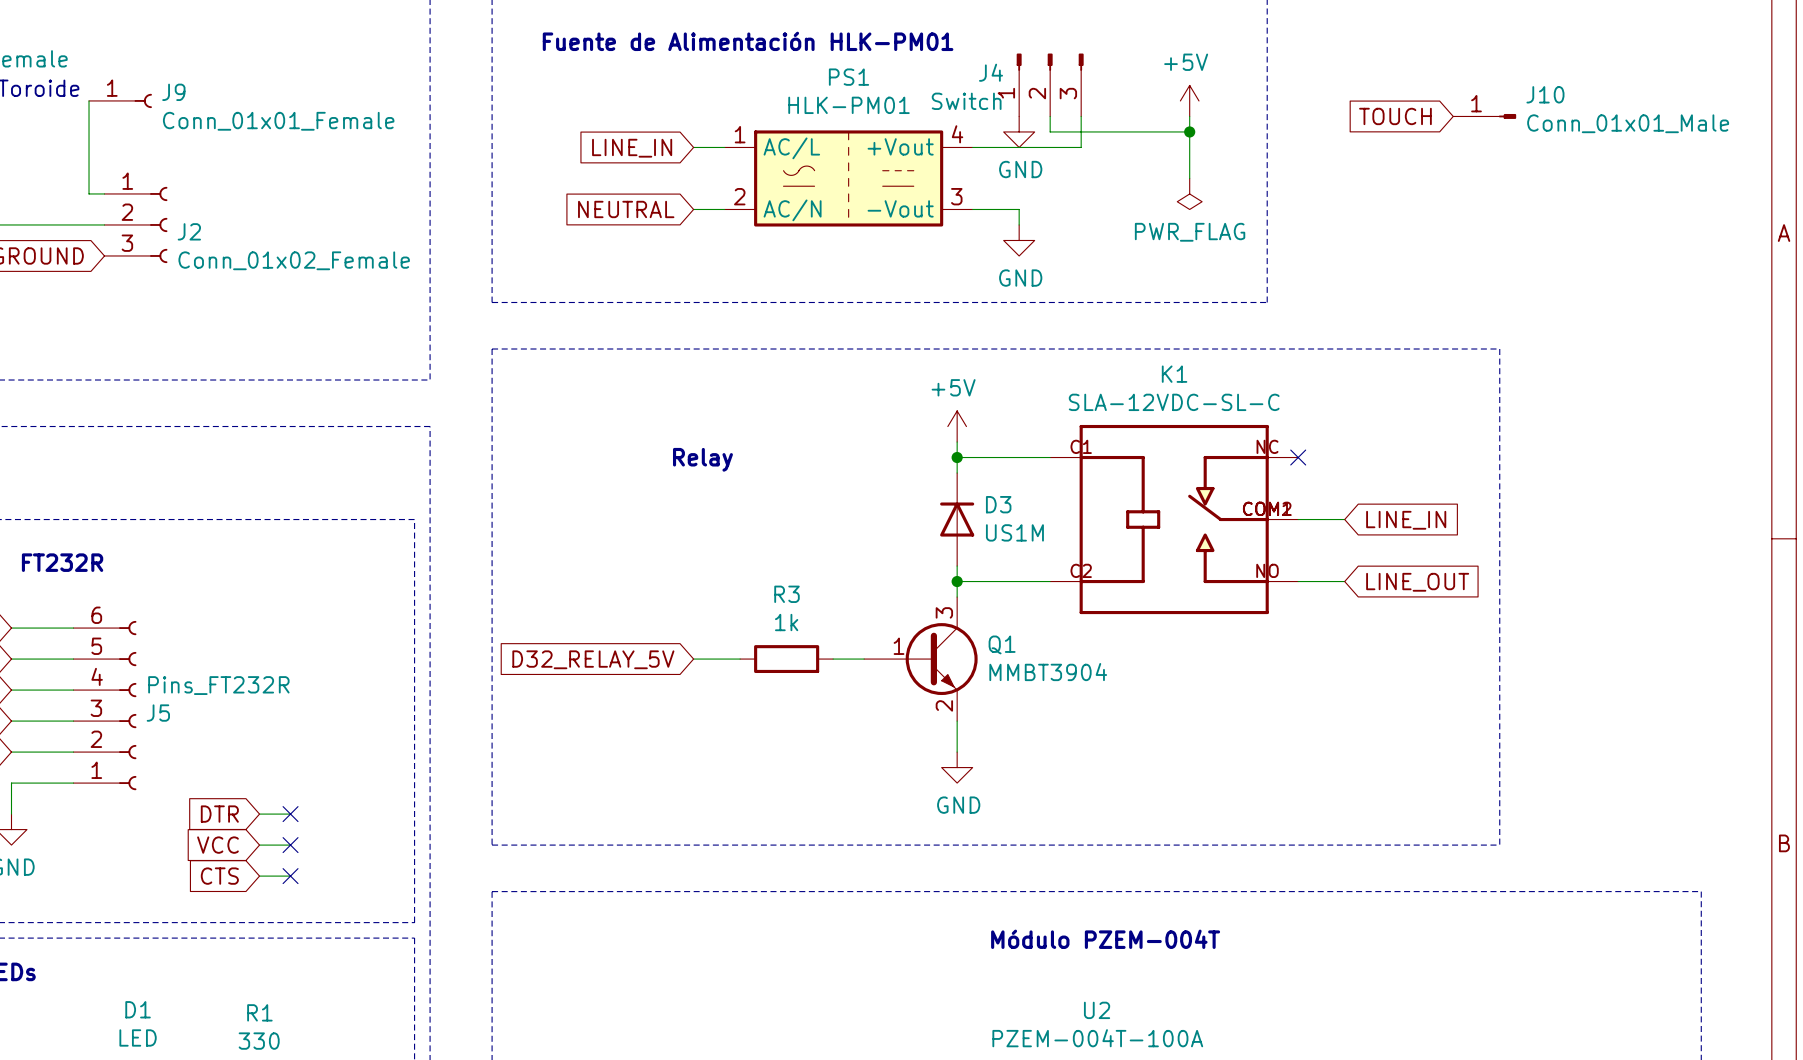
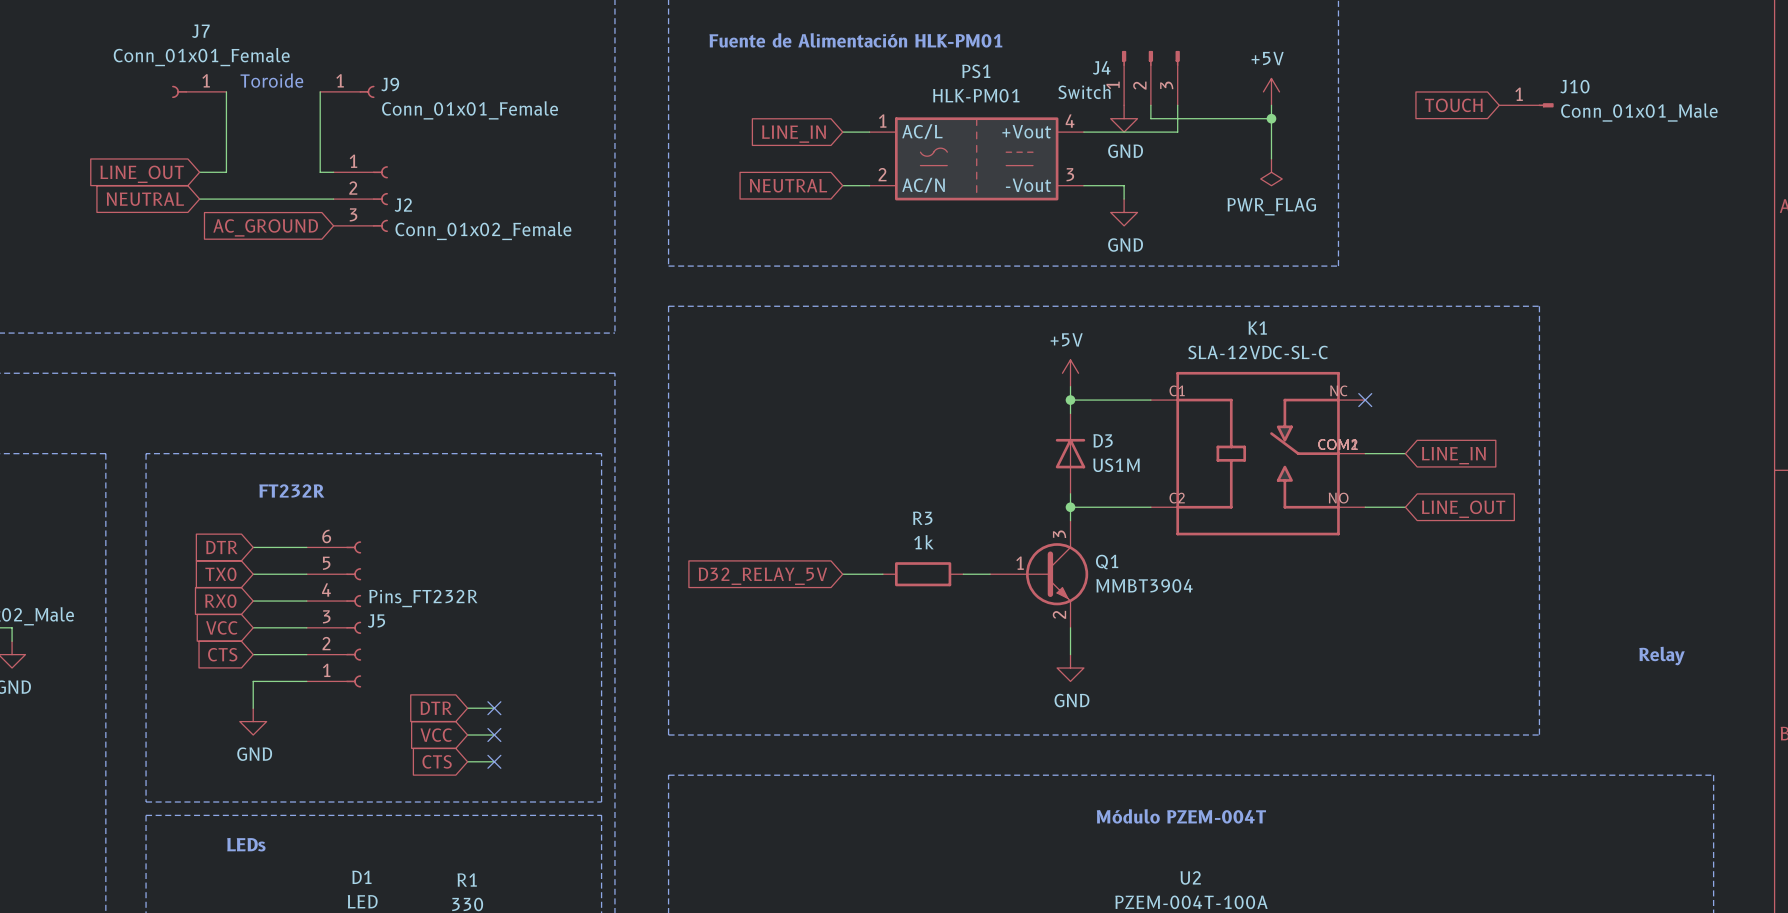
text: Relay (702, 459) -> none
text: none -> Relay (1662, 656)

